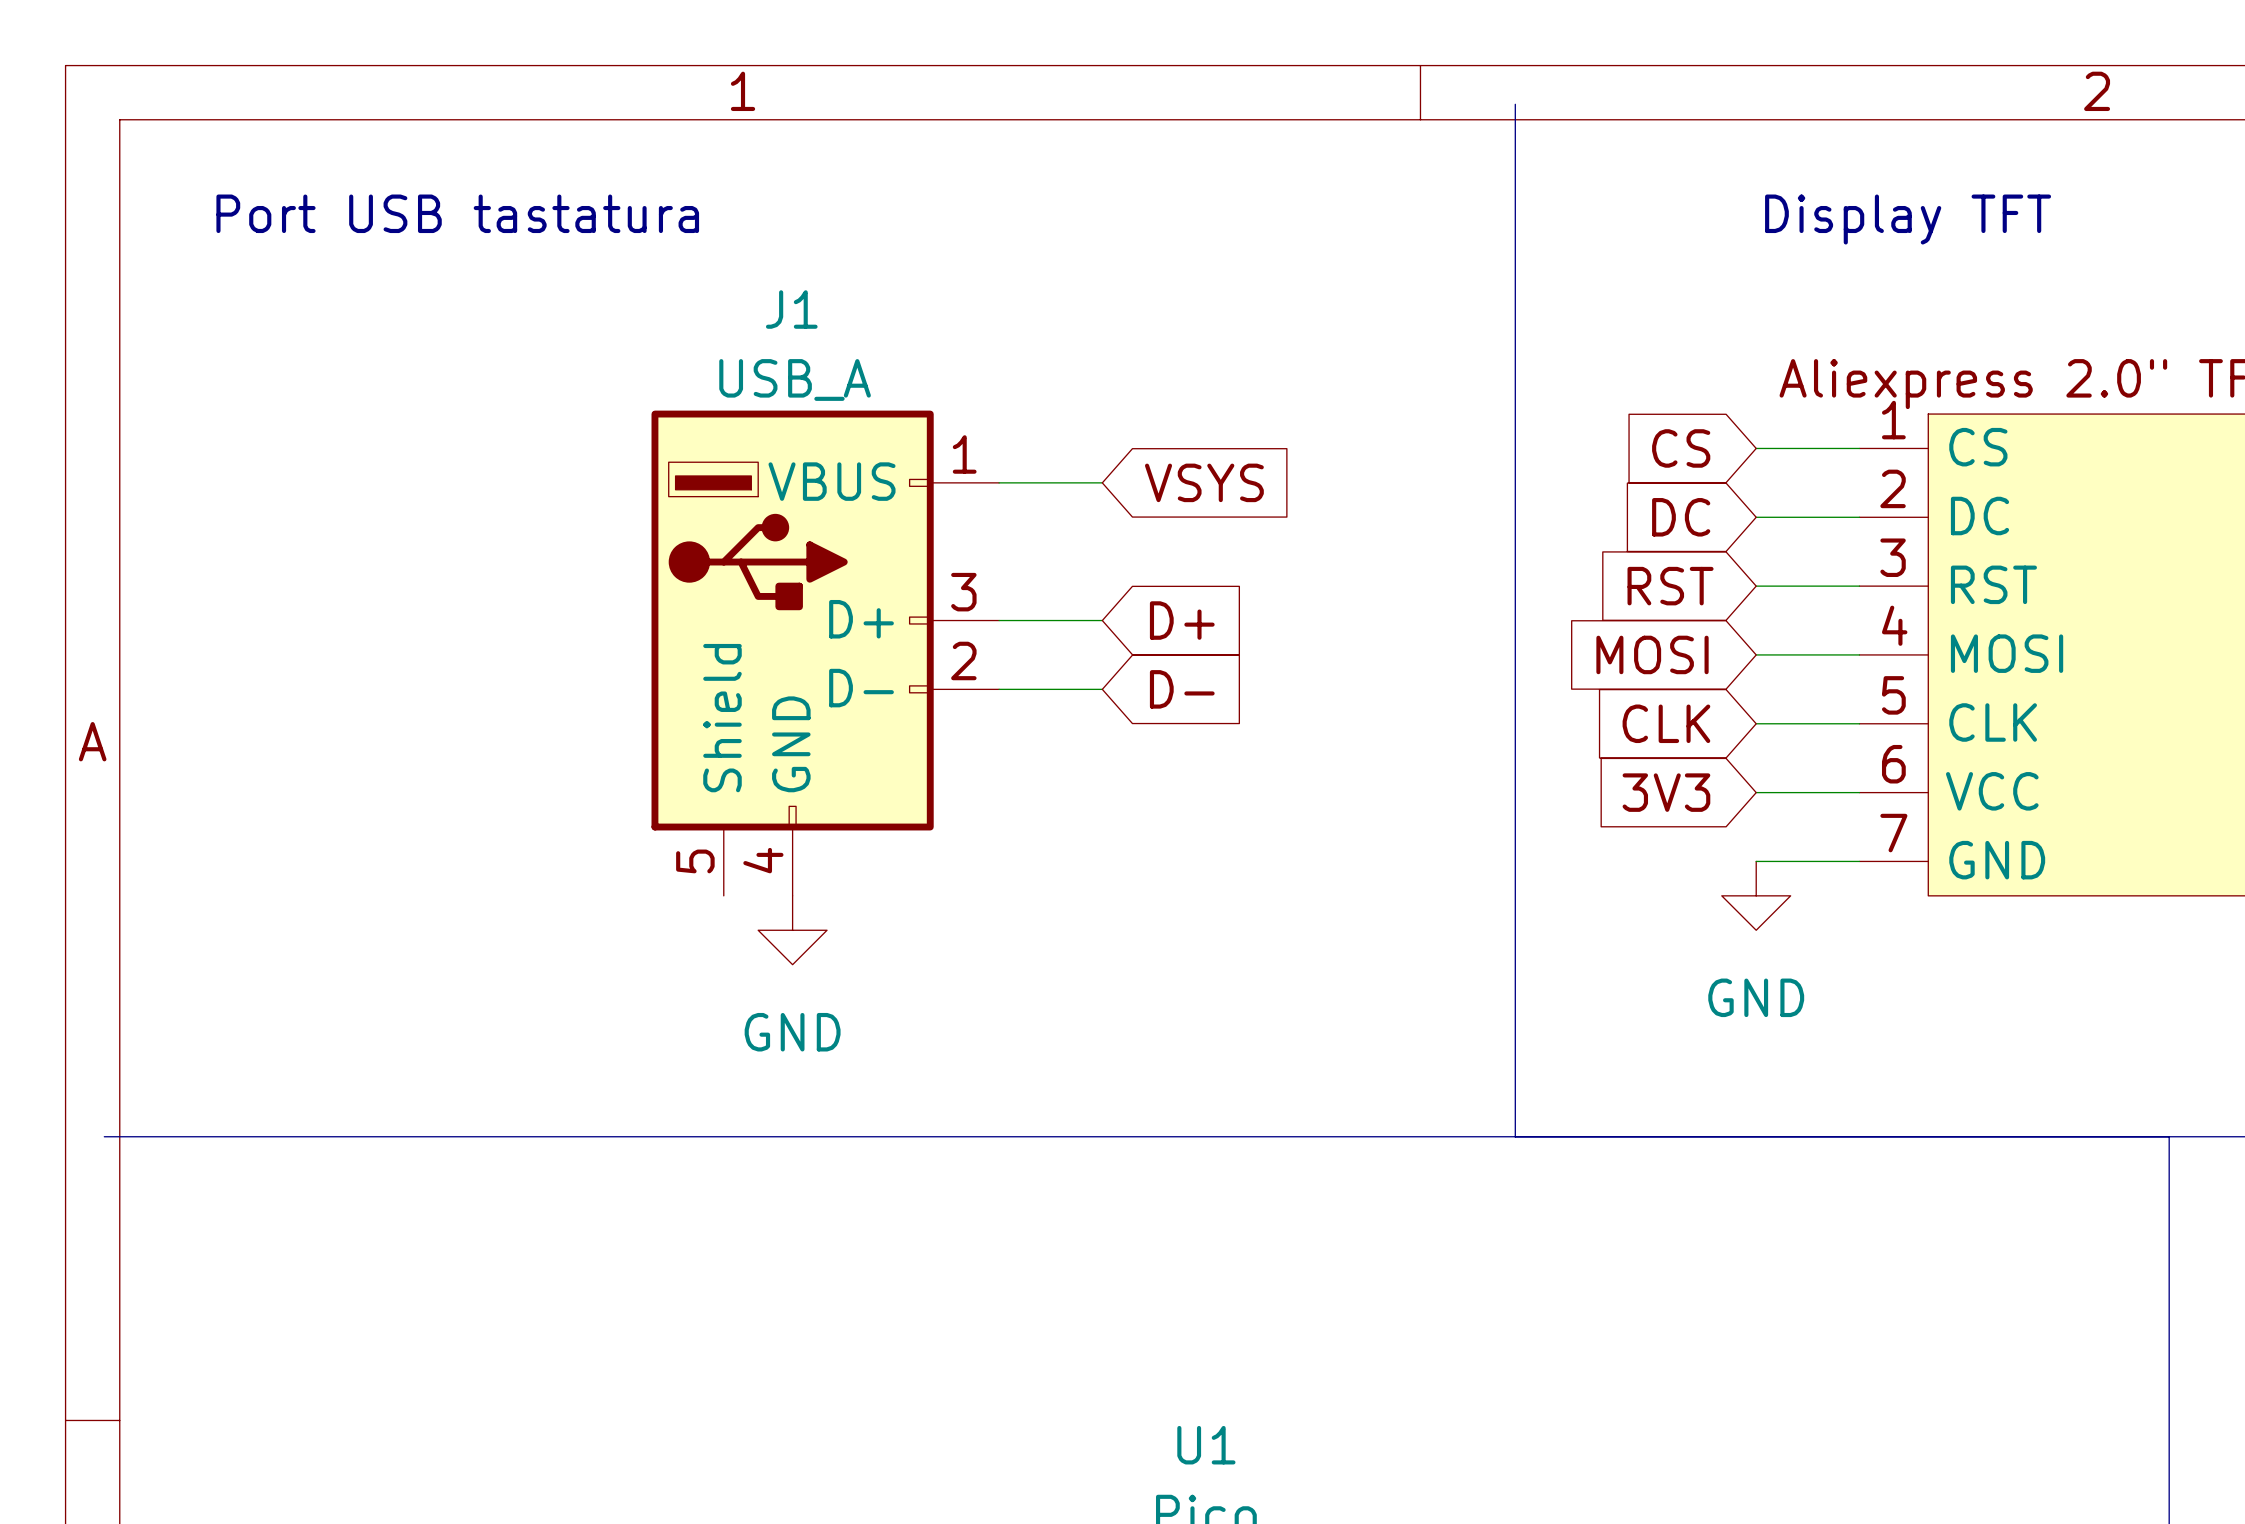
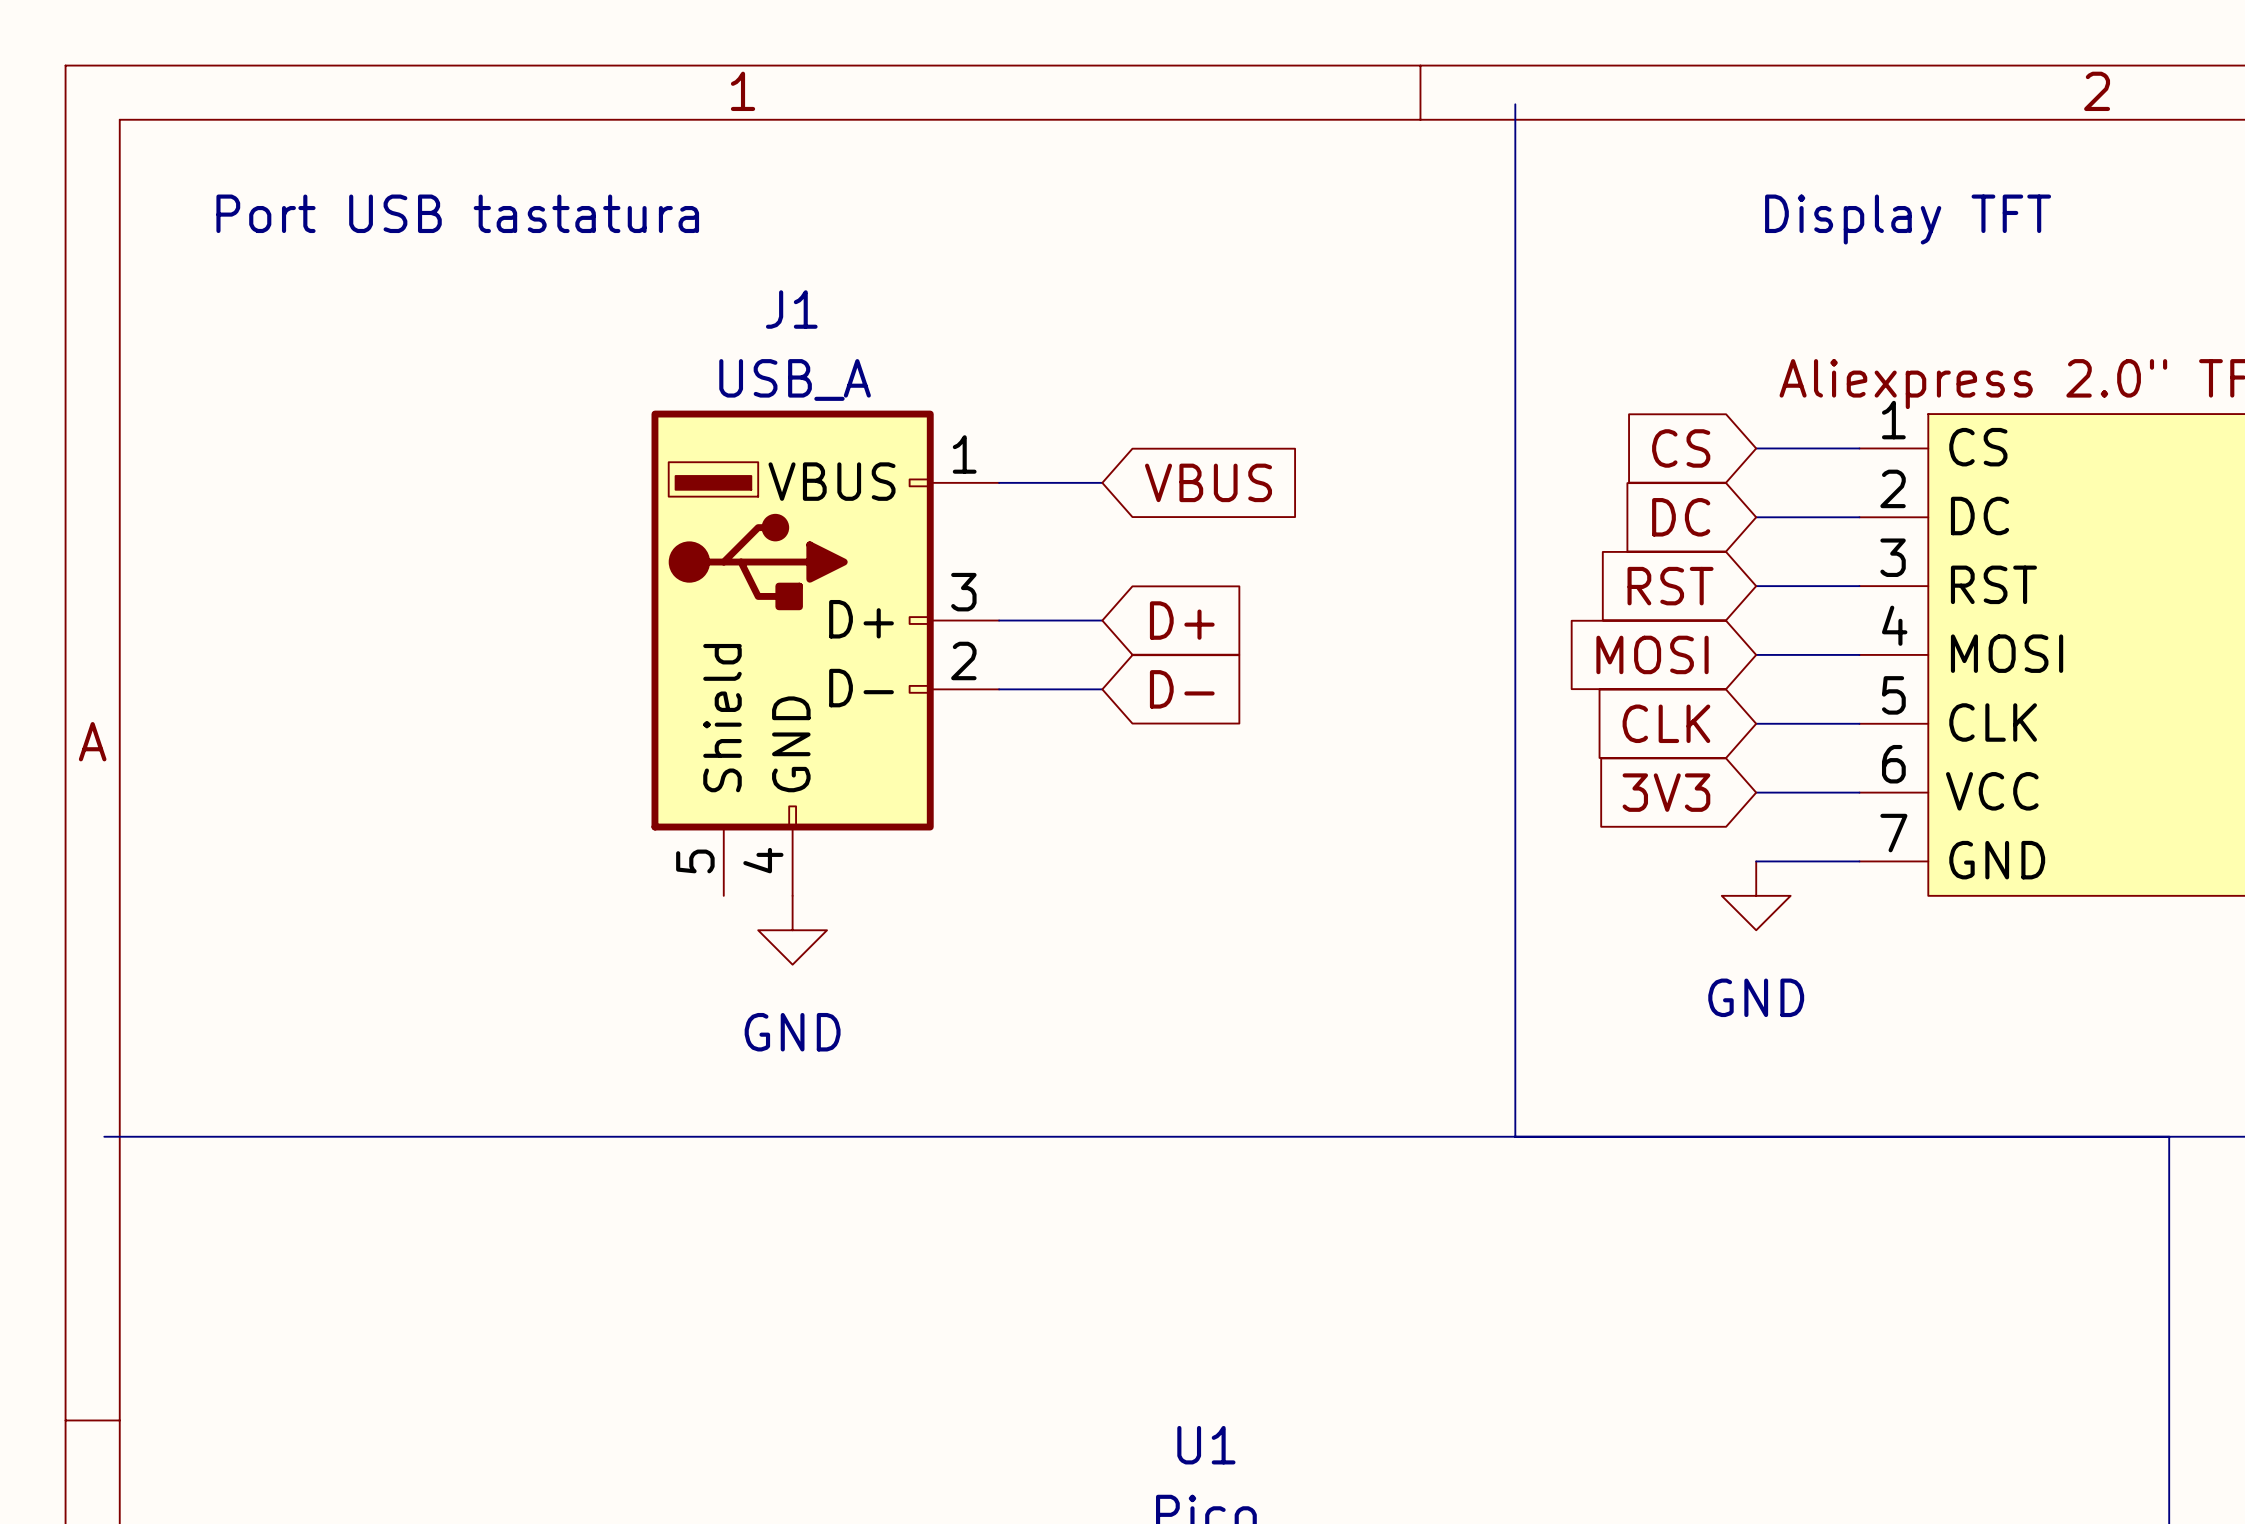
global label: VSYS (1204, 482) -> VBUS (1208, 482)

